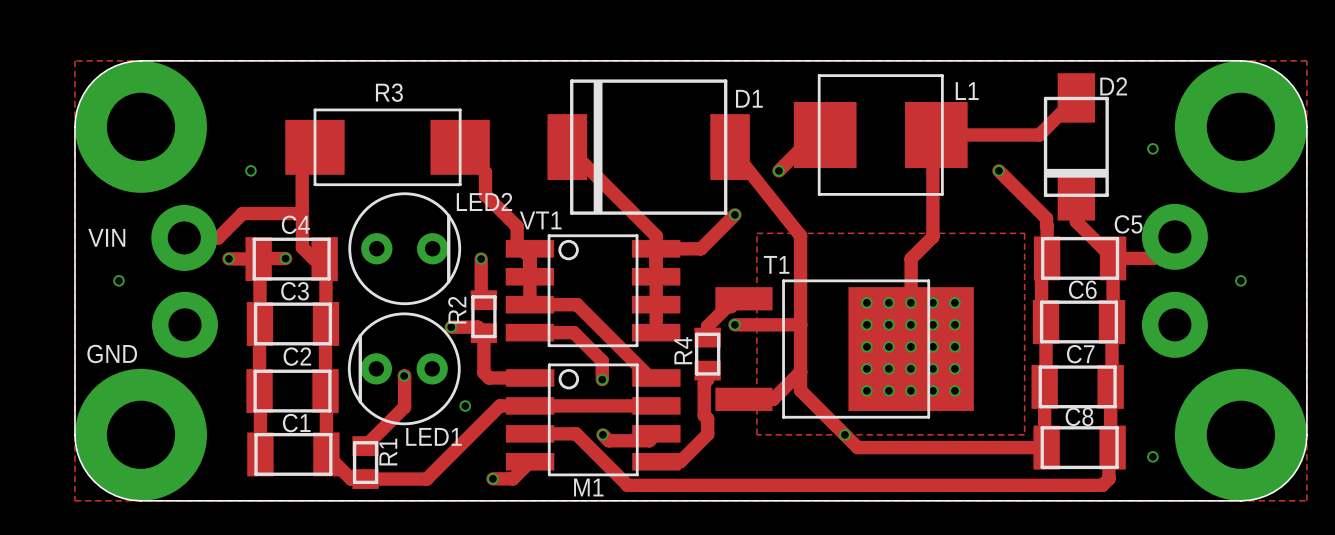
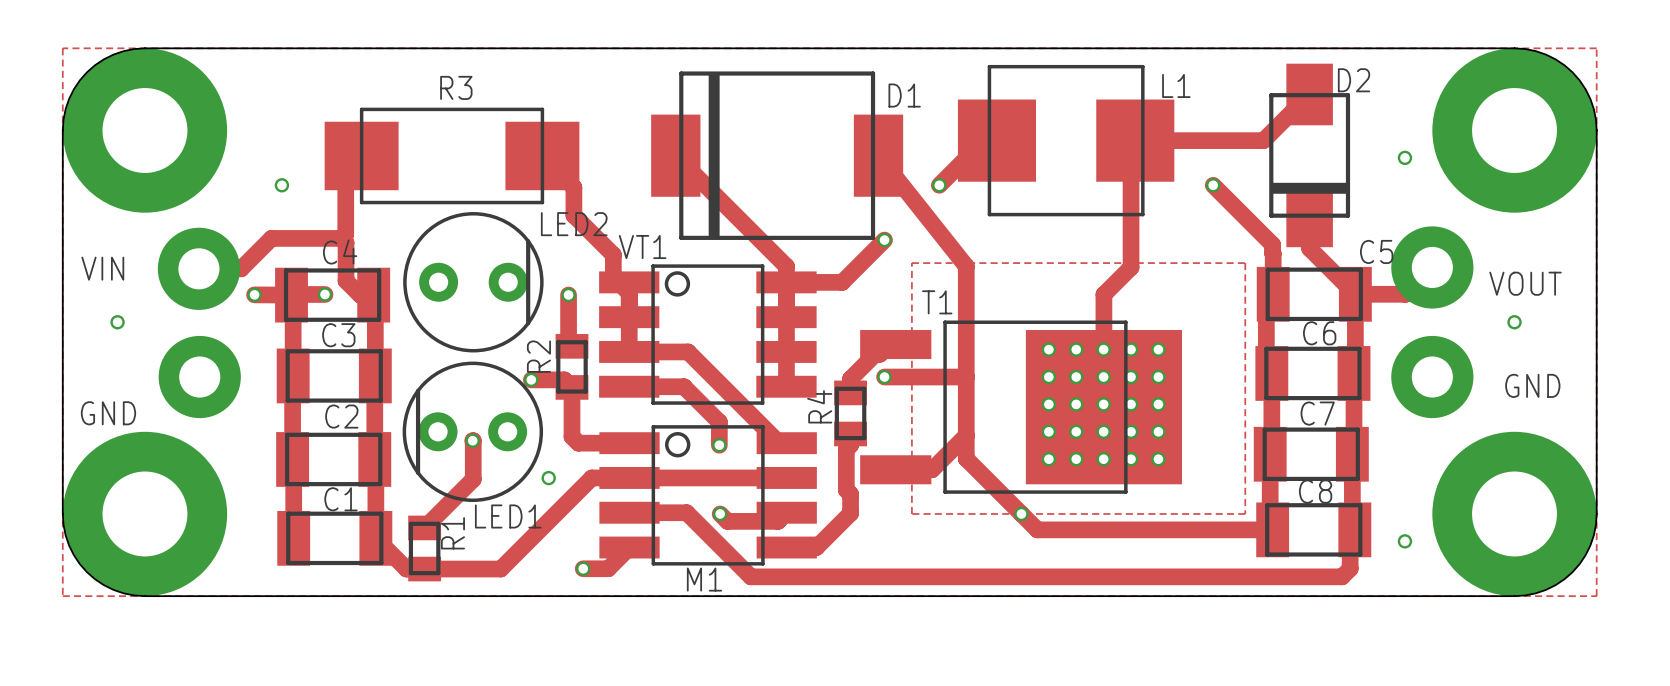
text: none -> VOUT (1525, 283)
text: none -> GND (1532, 385)

